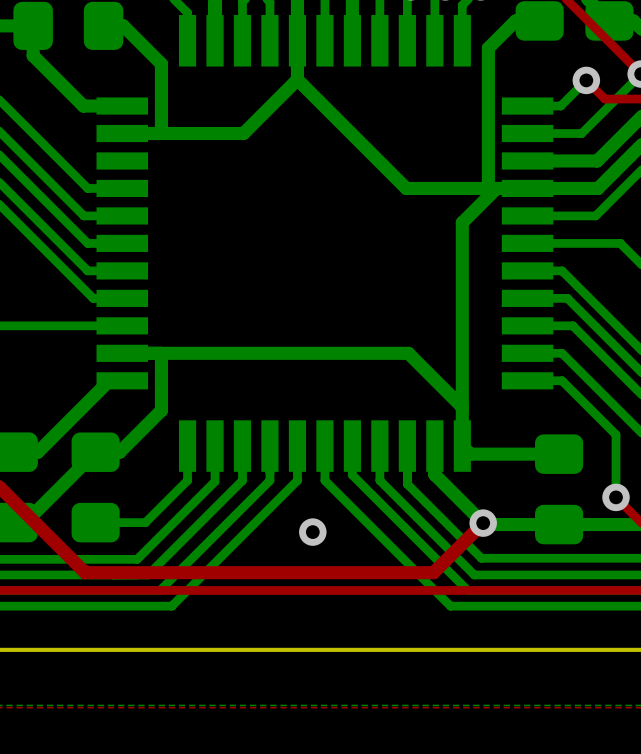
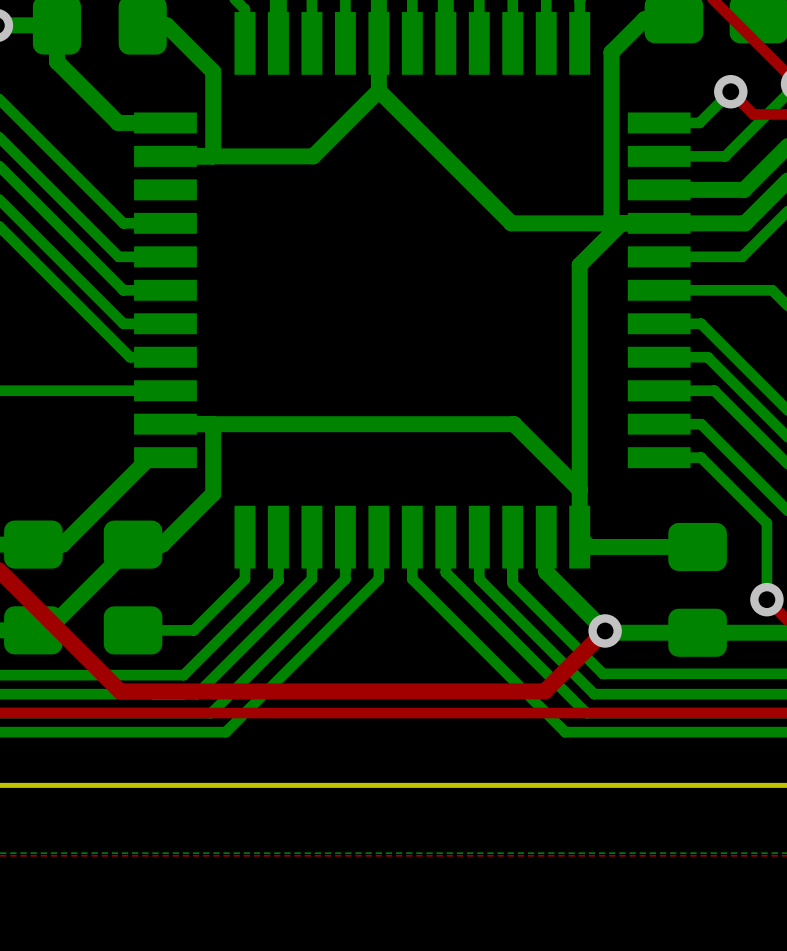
via: (312, 532) -> none

